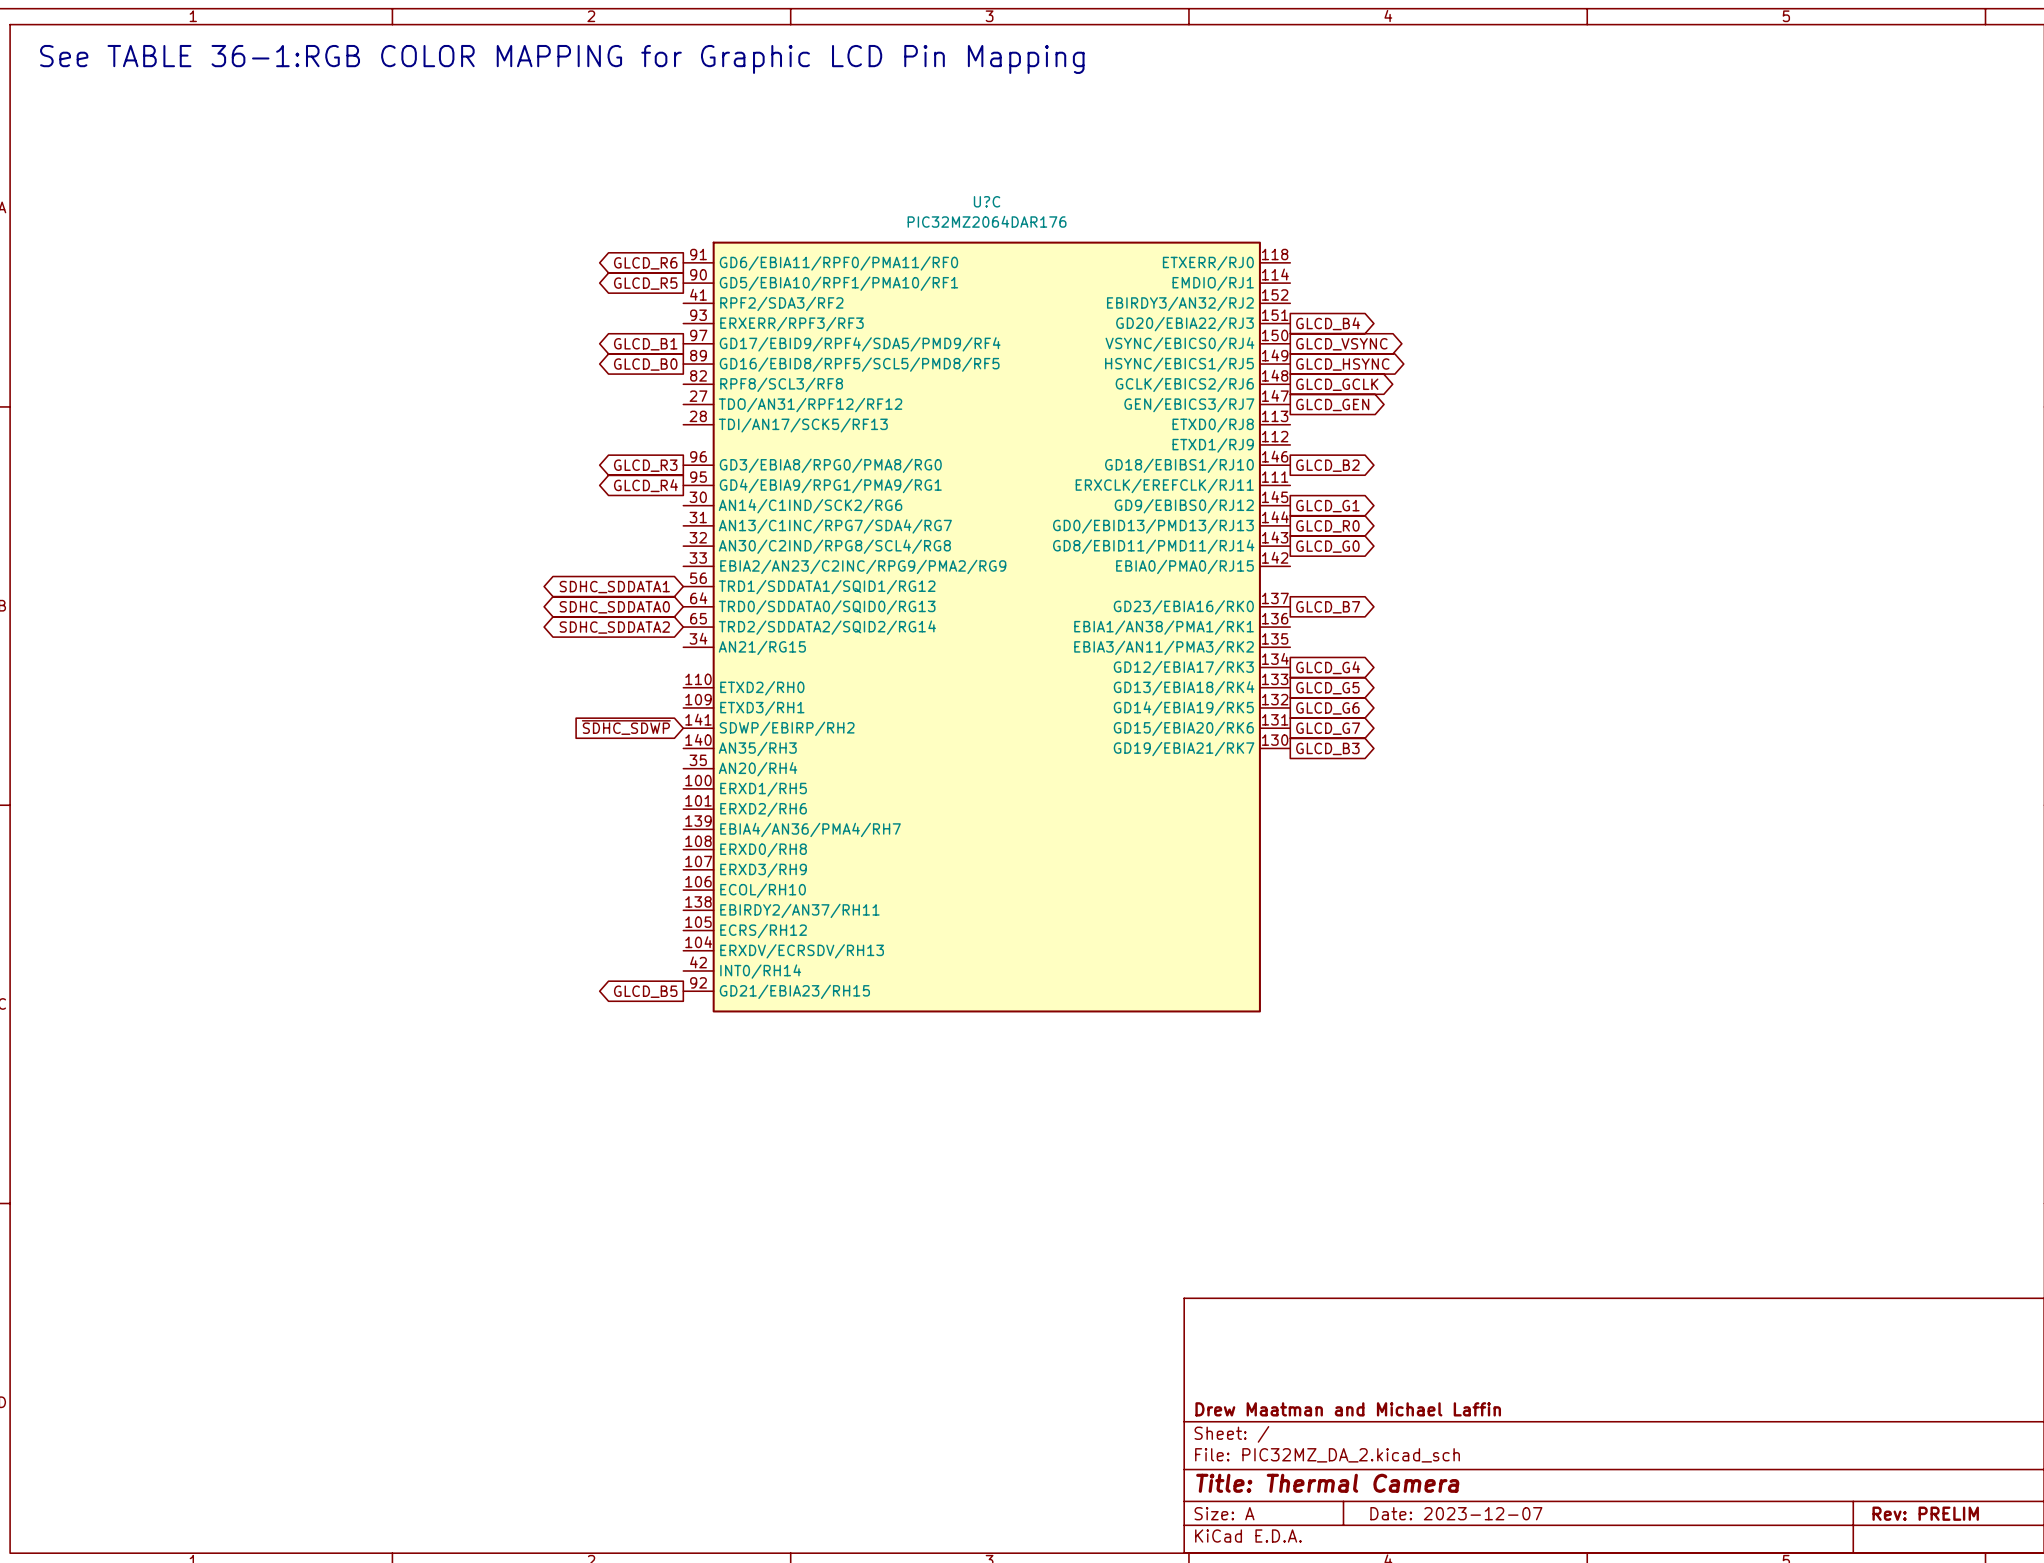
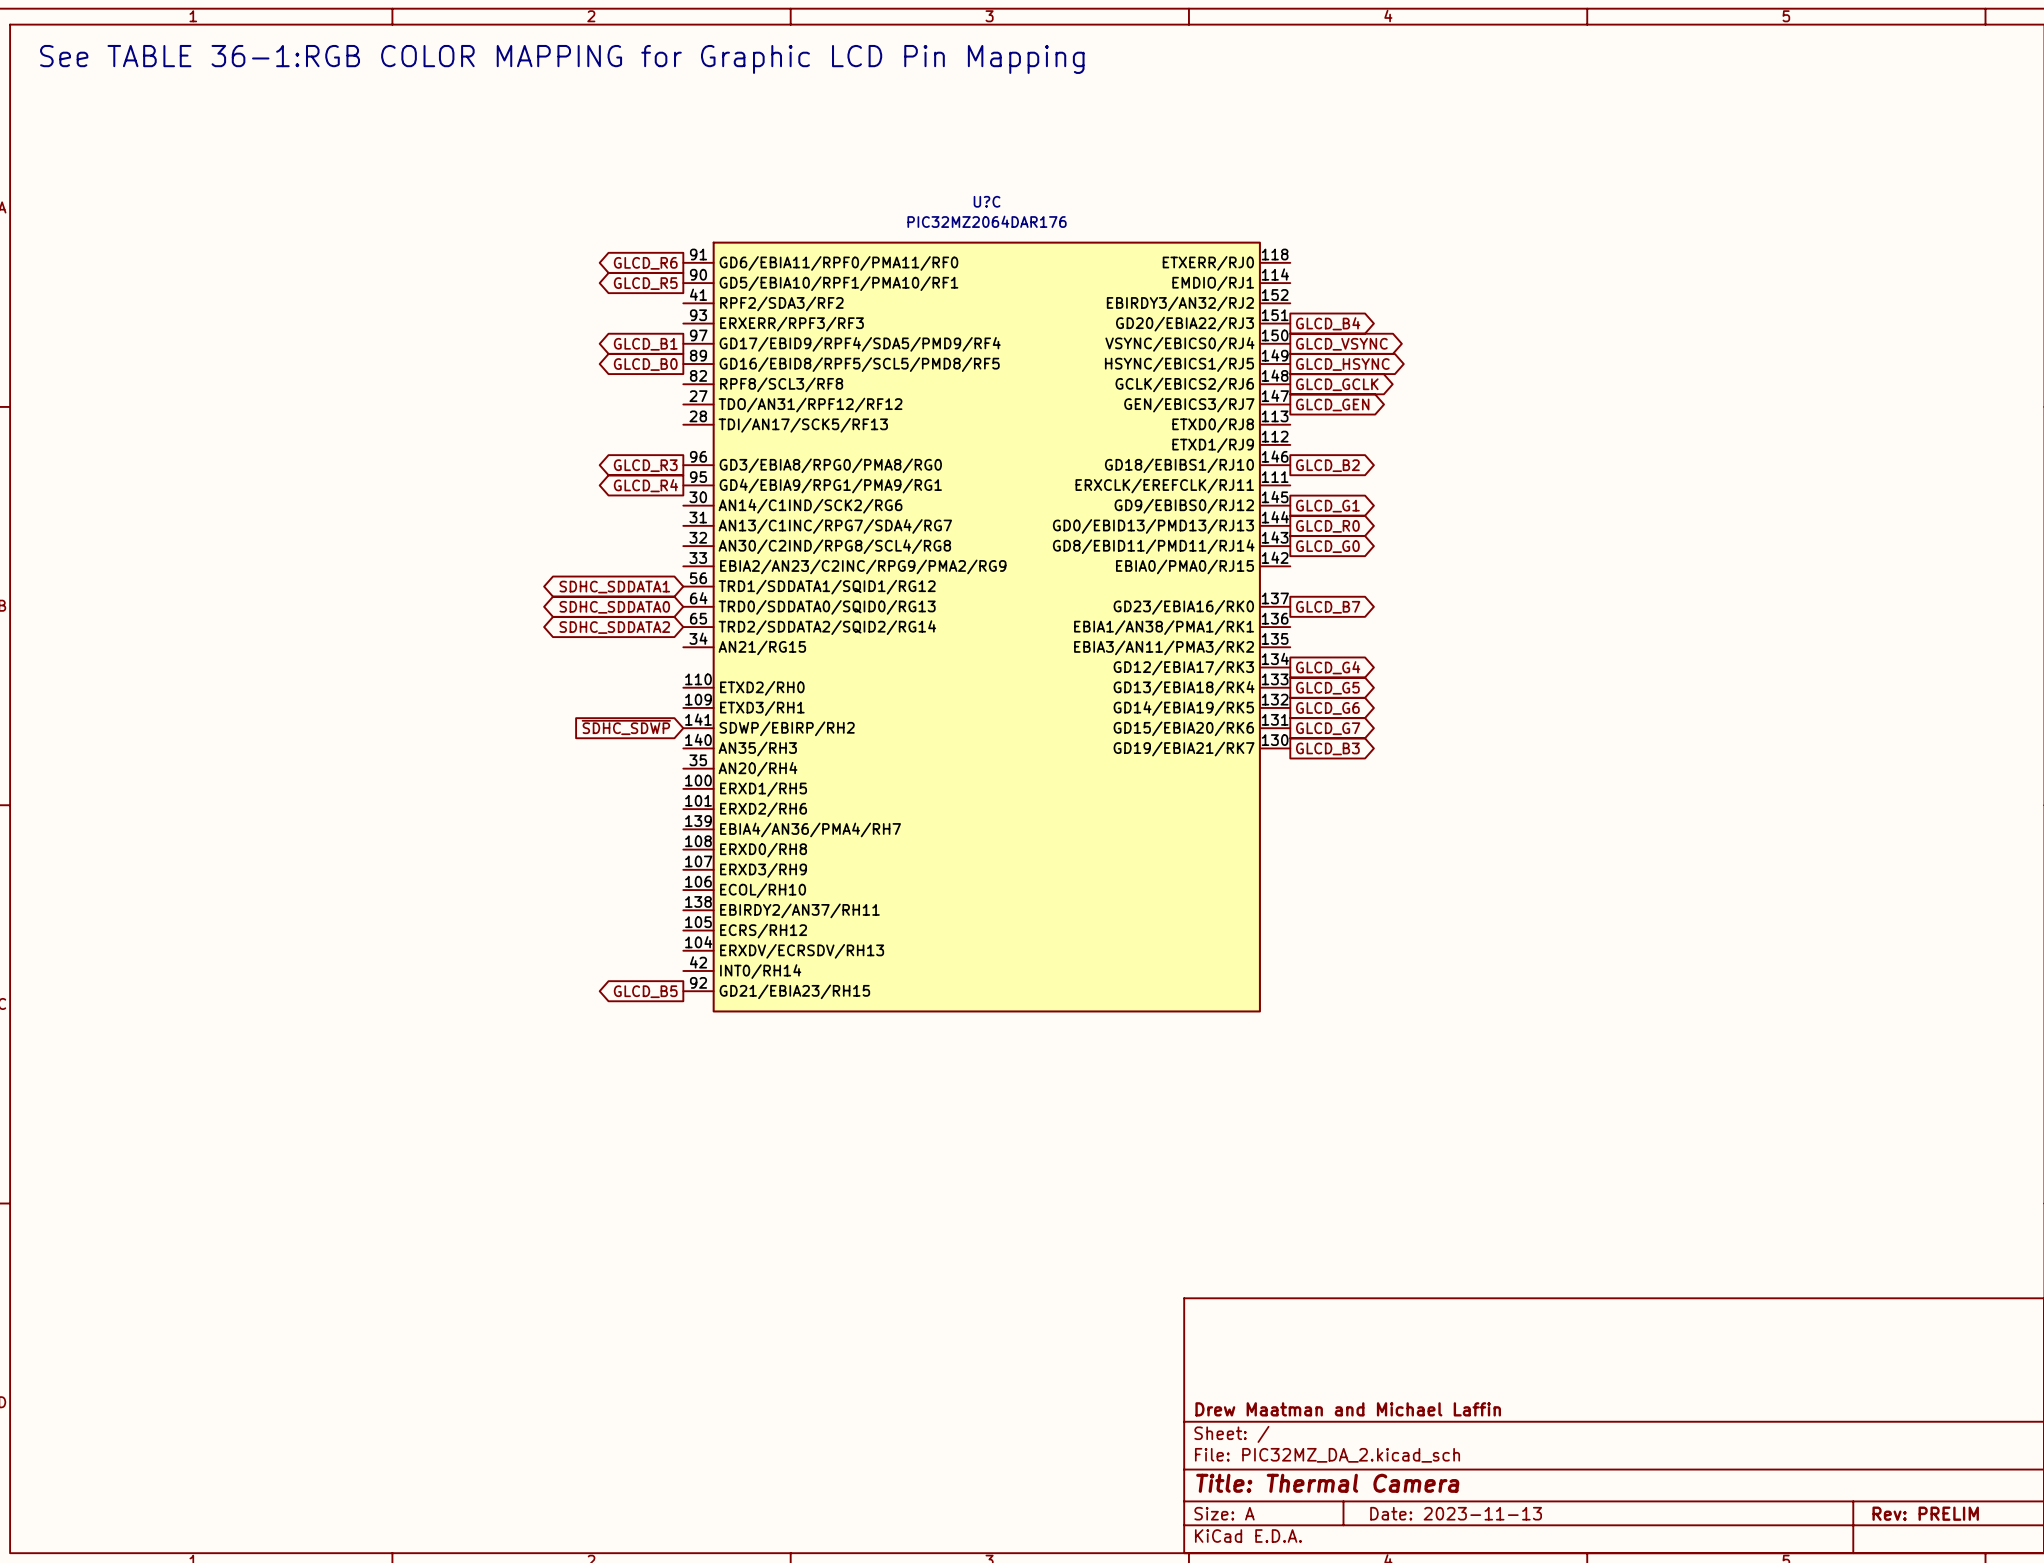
title block: Date: 2023-12-07 (1456, 1513) -> Date: 2023-11-13 (1456, 1513)

